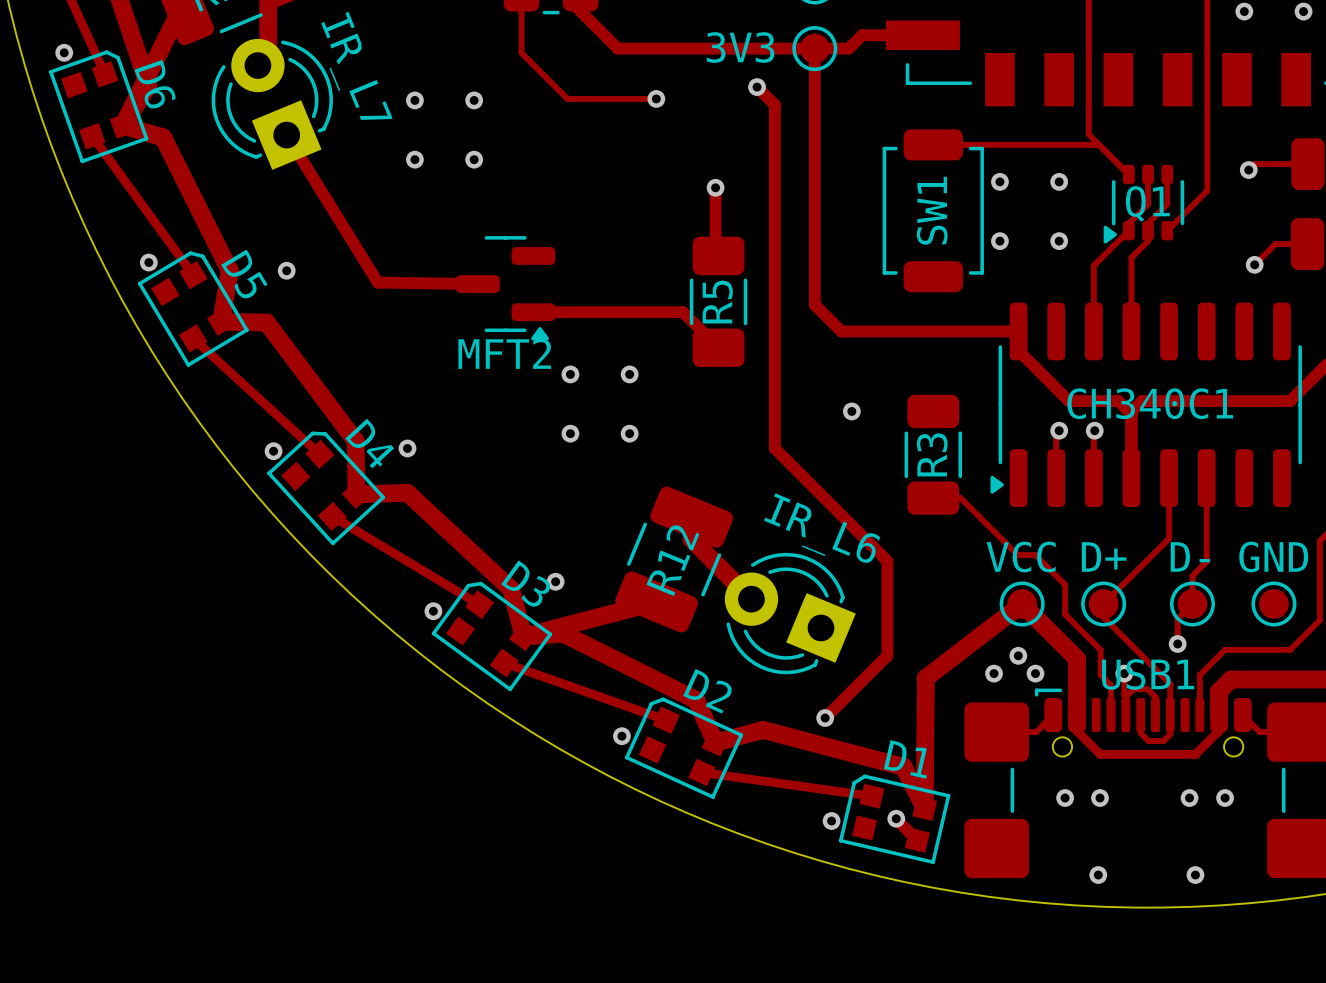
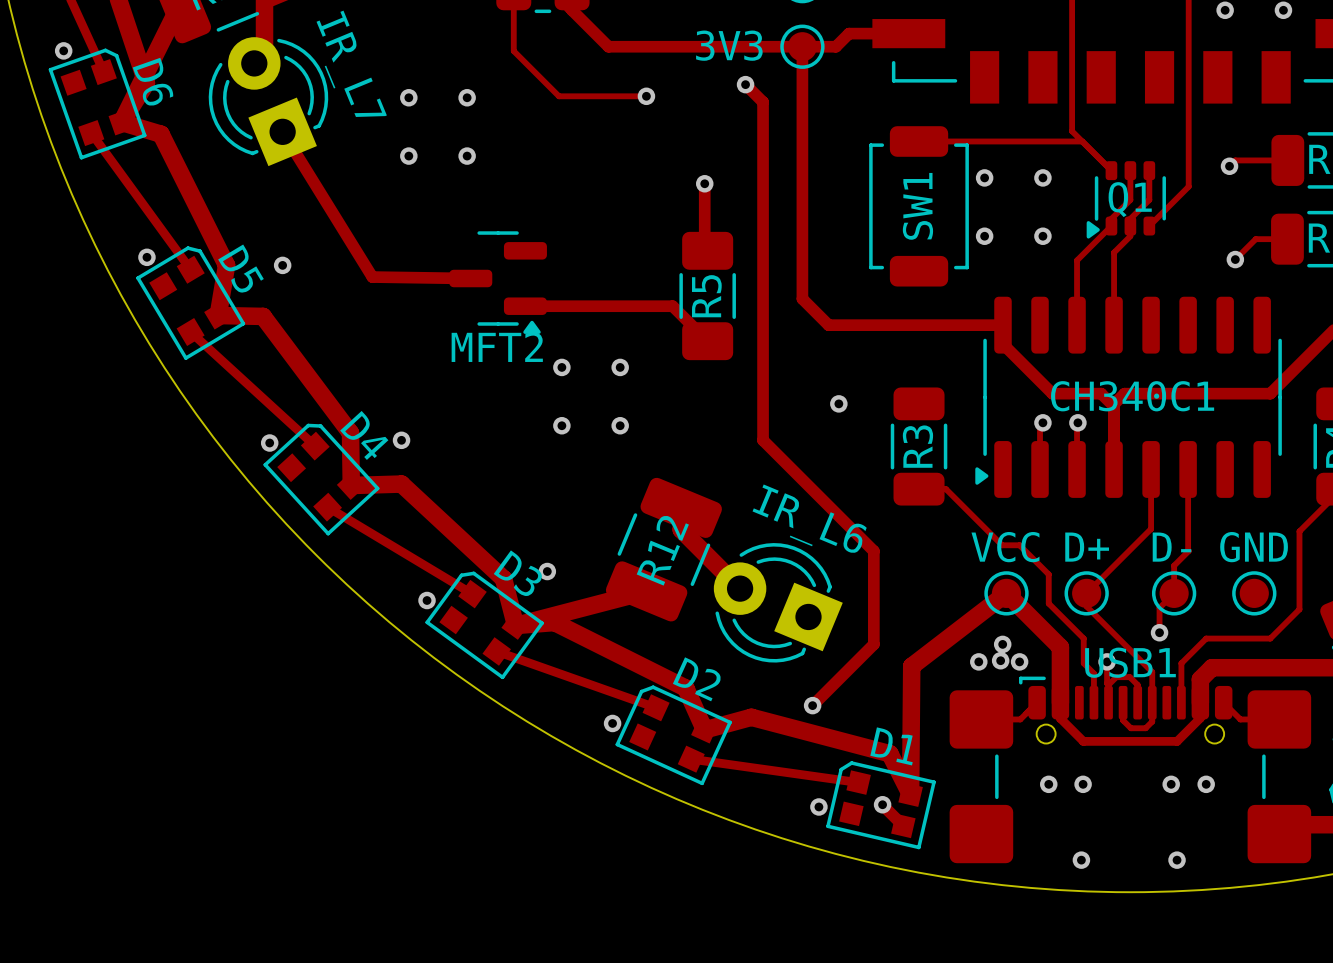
via: none -> (1000, 660)

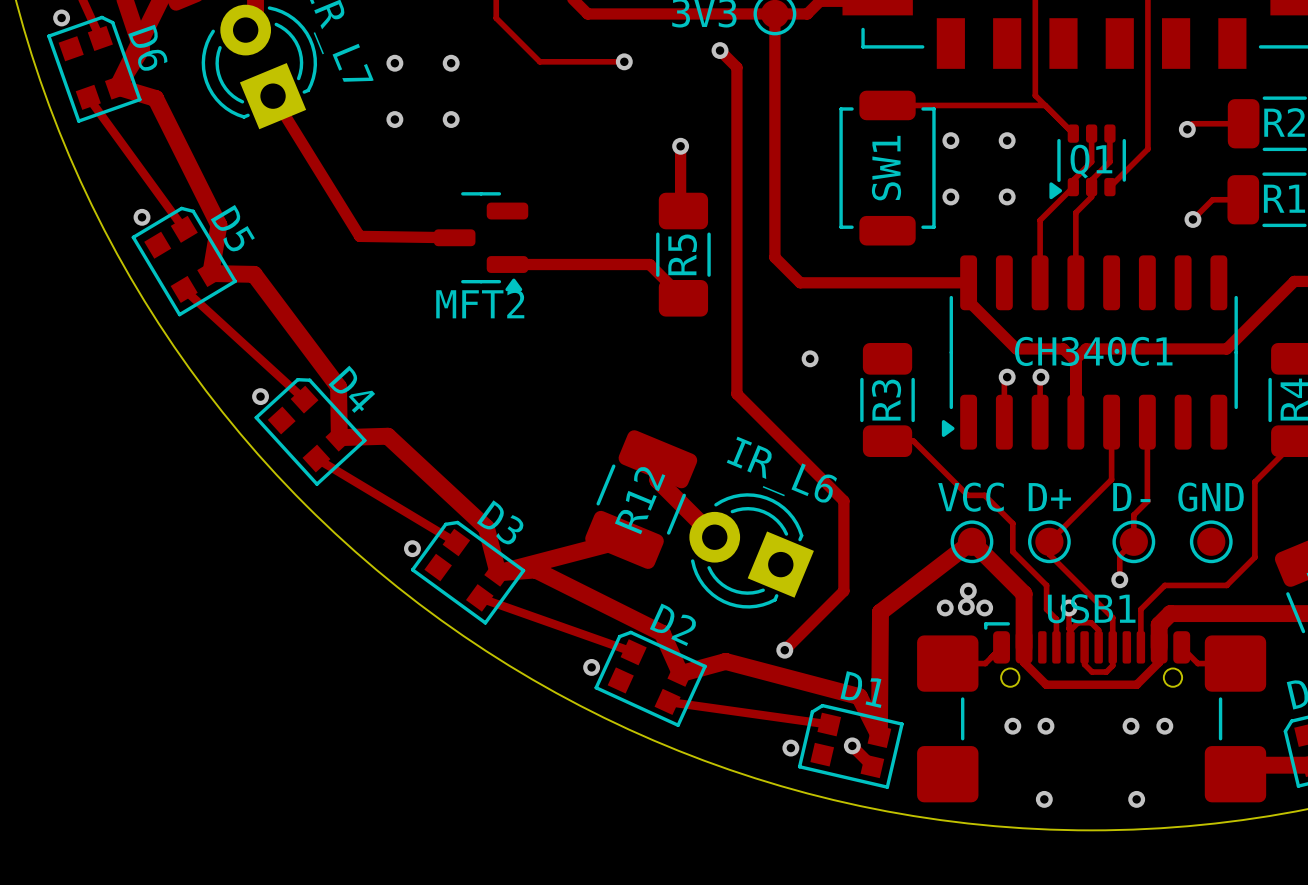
via: (282, 265) -> none
via: (561, 367) -> none
via: (620, 367) -> none
via: (561, 425) -> none
via: (620, 425) -> none
via: (401, 440) -> none
via: (547, 571) -> none

